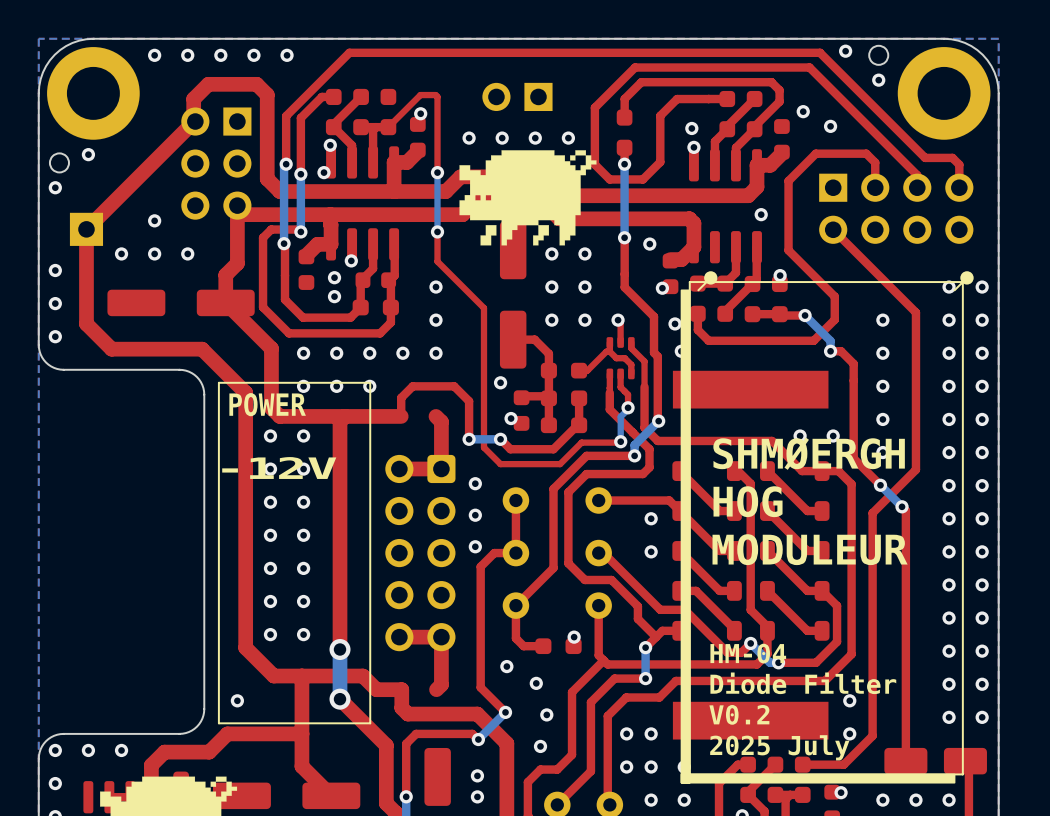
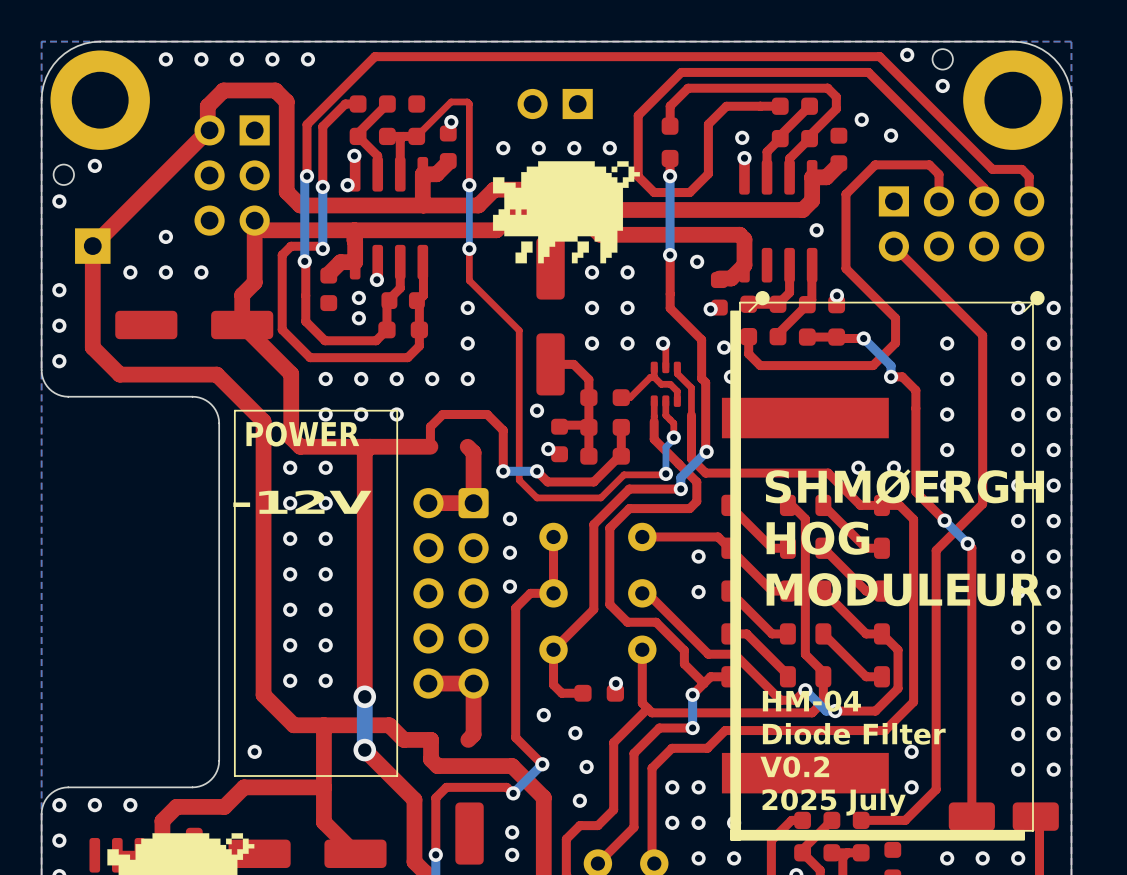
via: (841, 792) -> none

